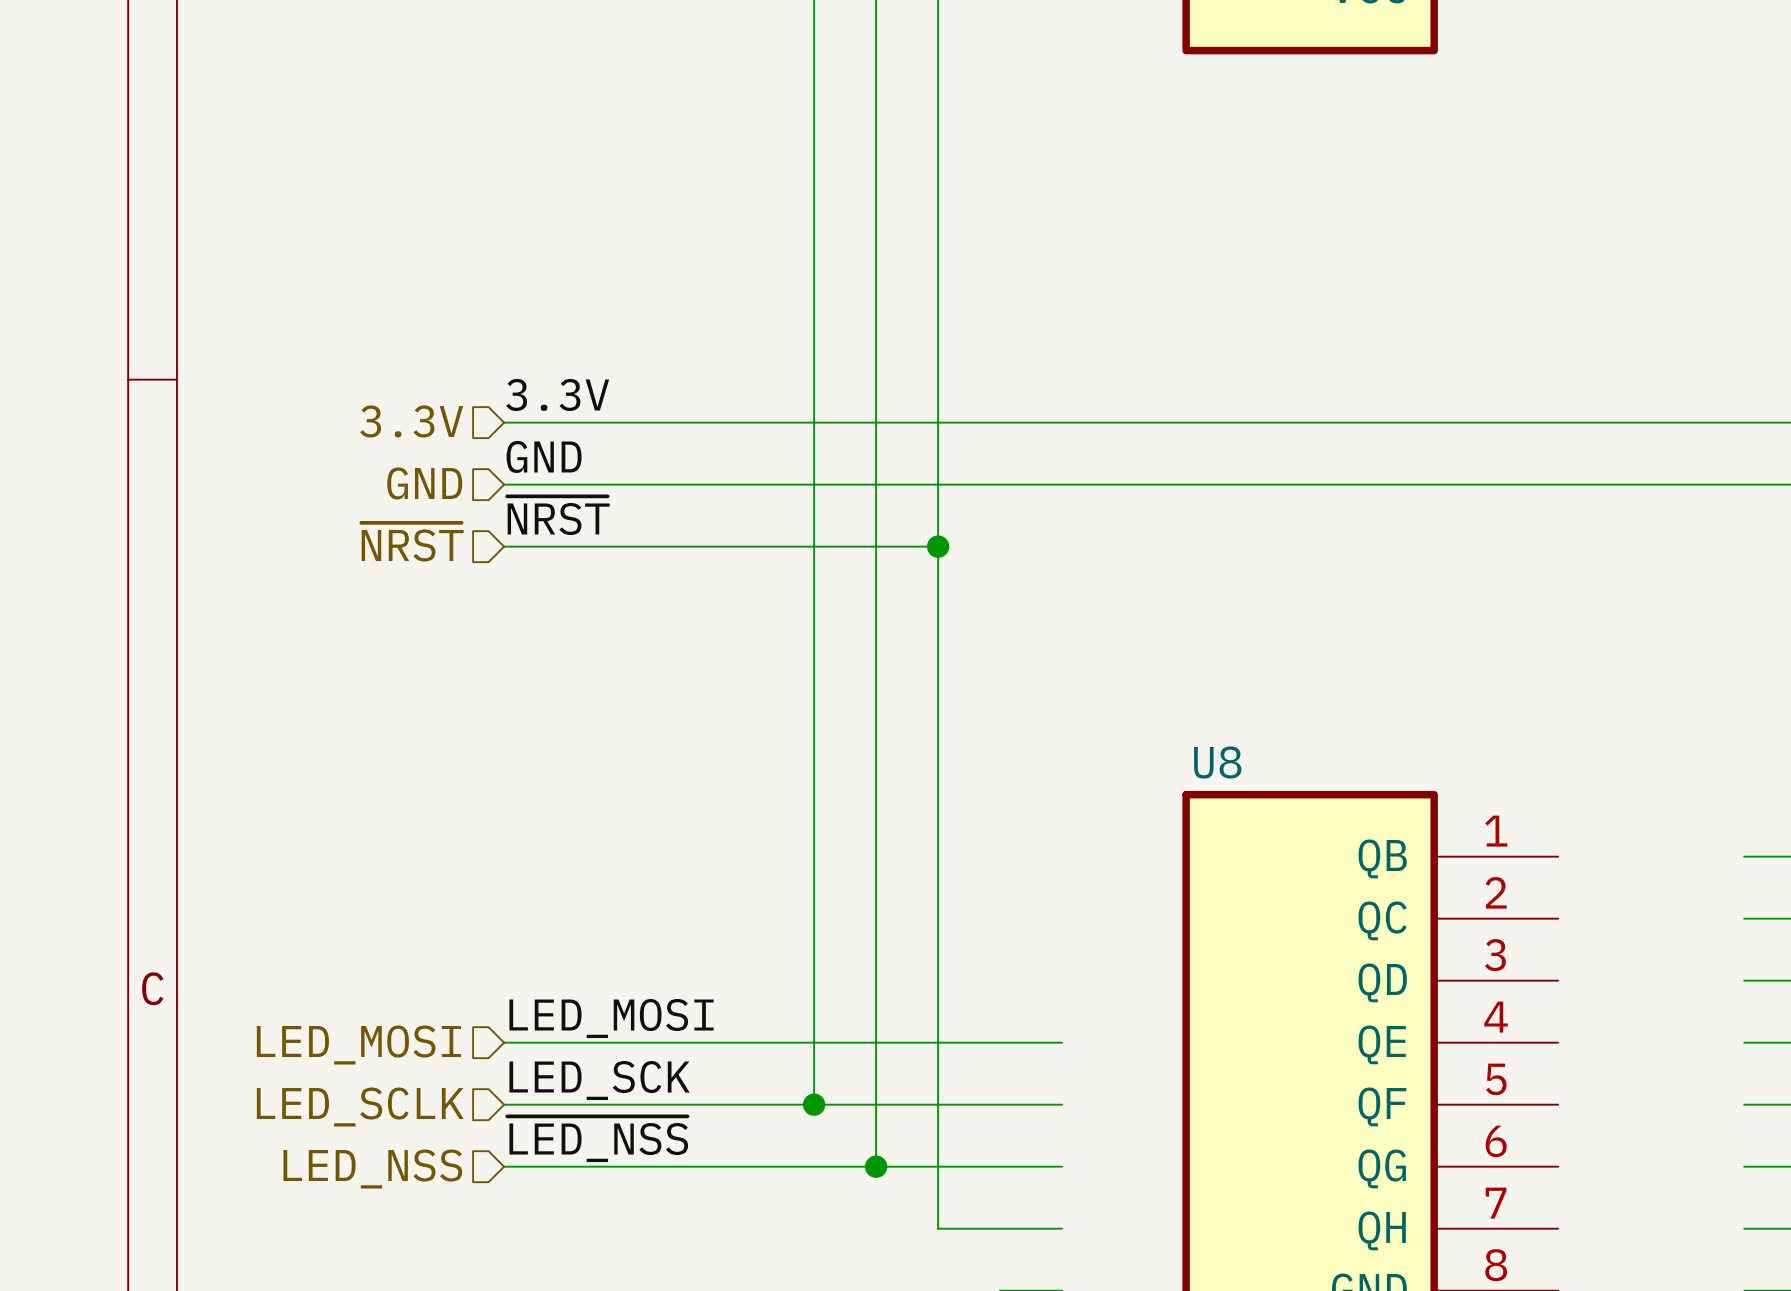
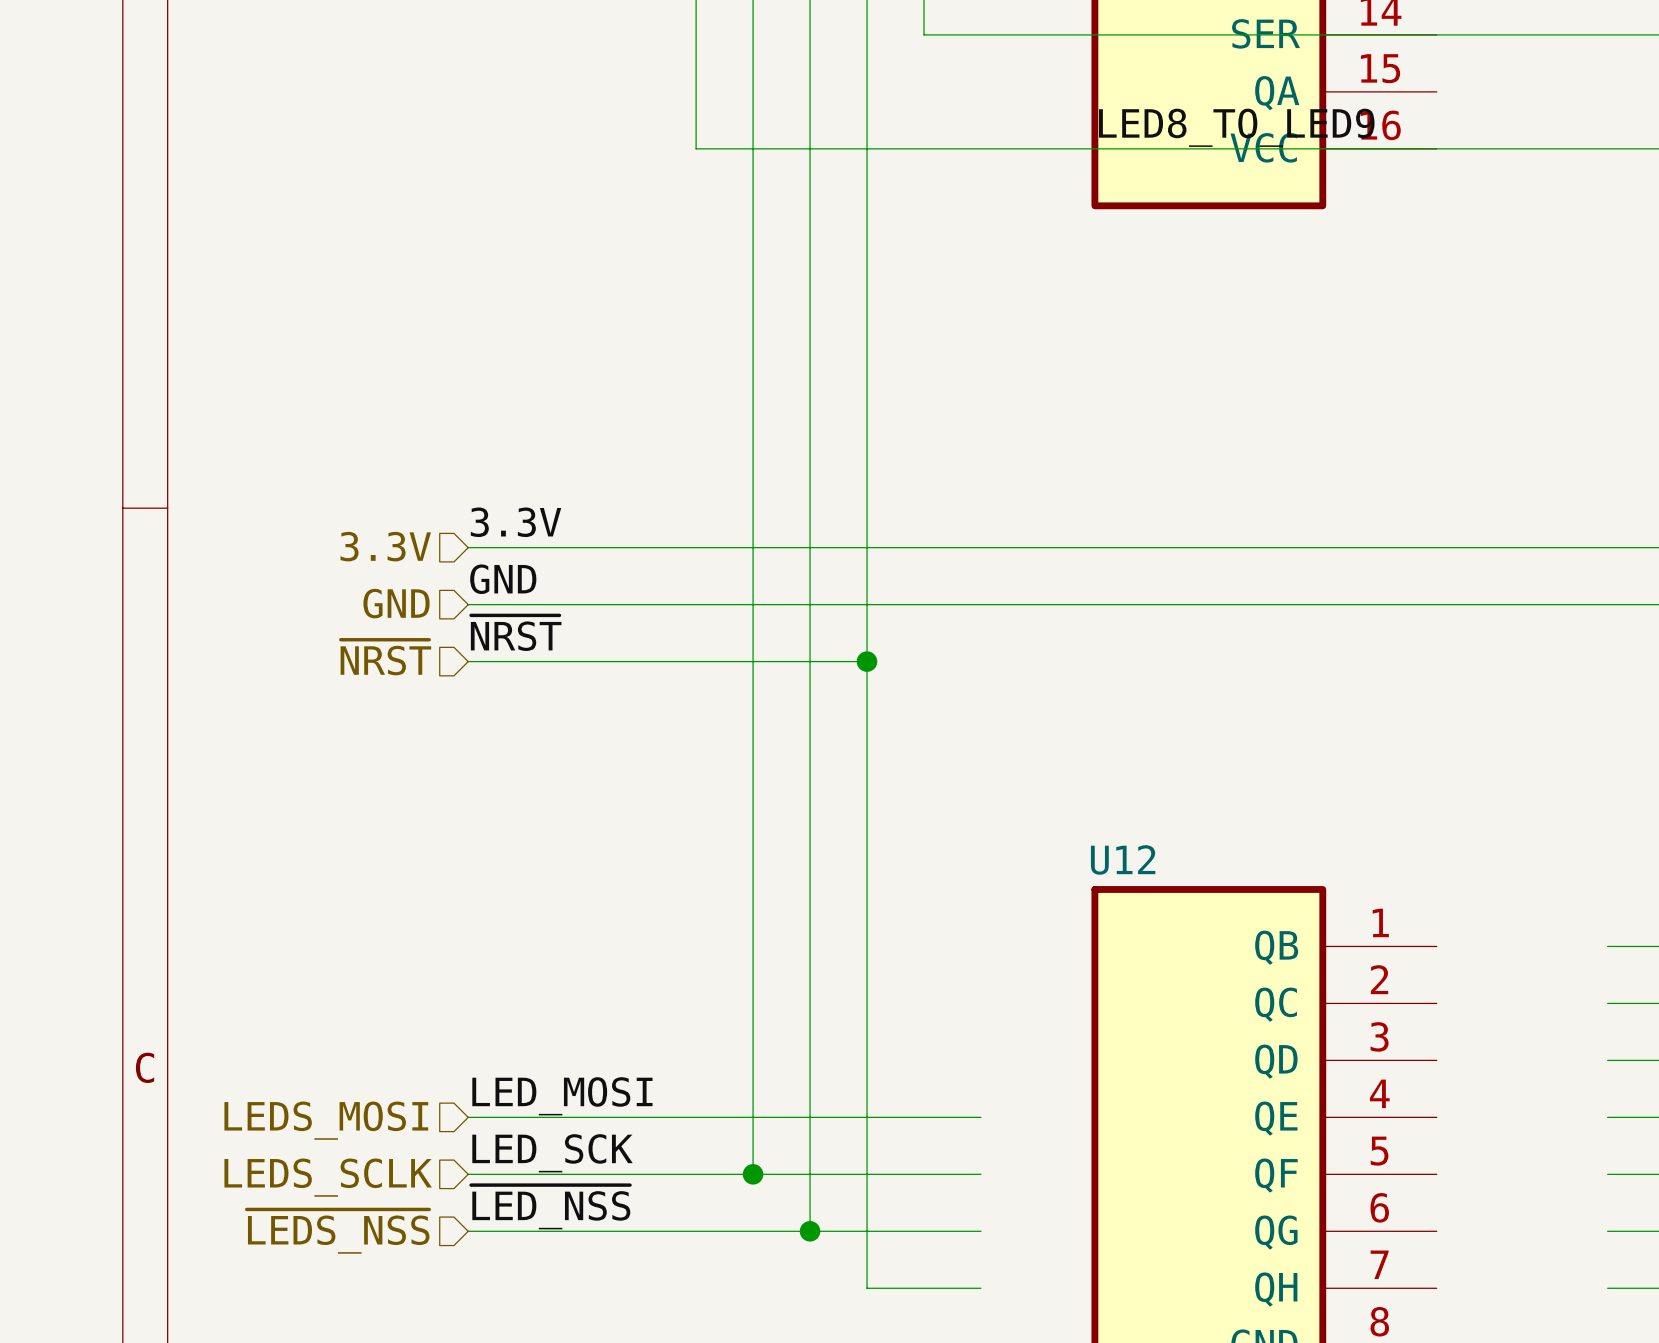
U8 name: U8 (1217, 762) -> U12 (1123, 859)
hierarchical label: LED_MOSI (358, 1045) -> LEDS_MOSI (326, 1120)
hierarchical label: LED_SCLK (360, 1107) -> LEDS_SCLK (328, 1177)
hierarchical label: LED_NSS (372, 1169) -> ~{LEDS_NSS} (338, 1231)

